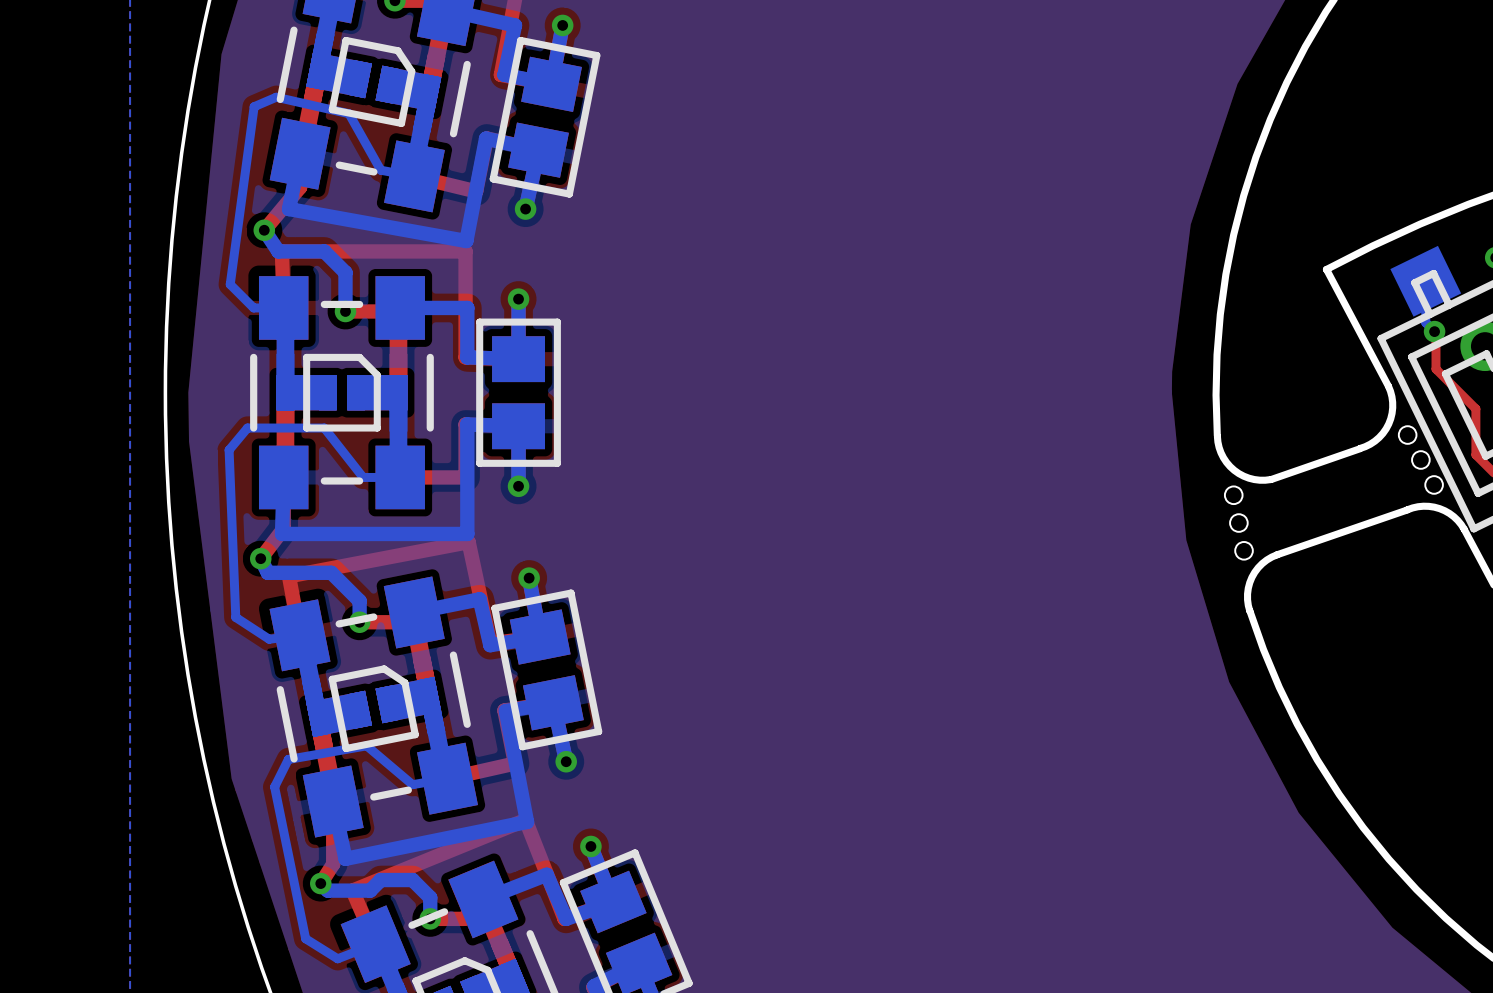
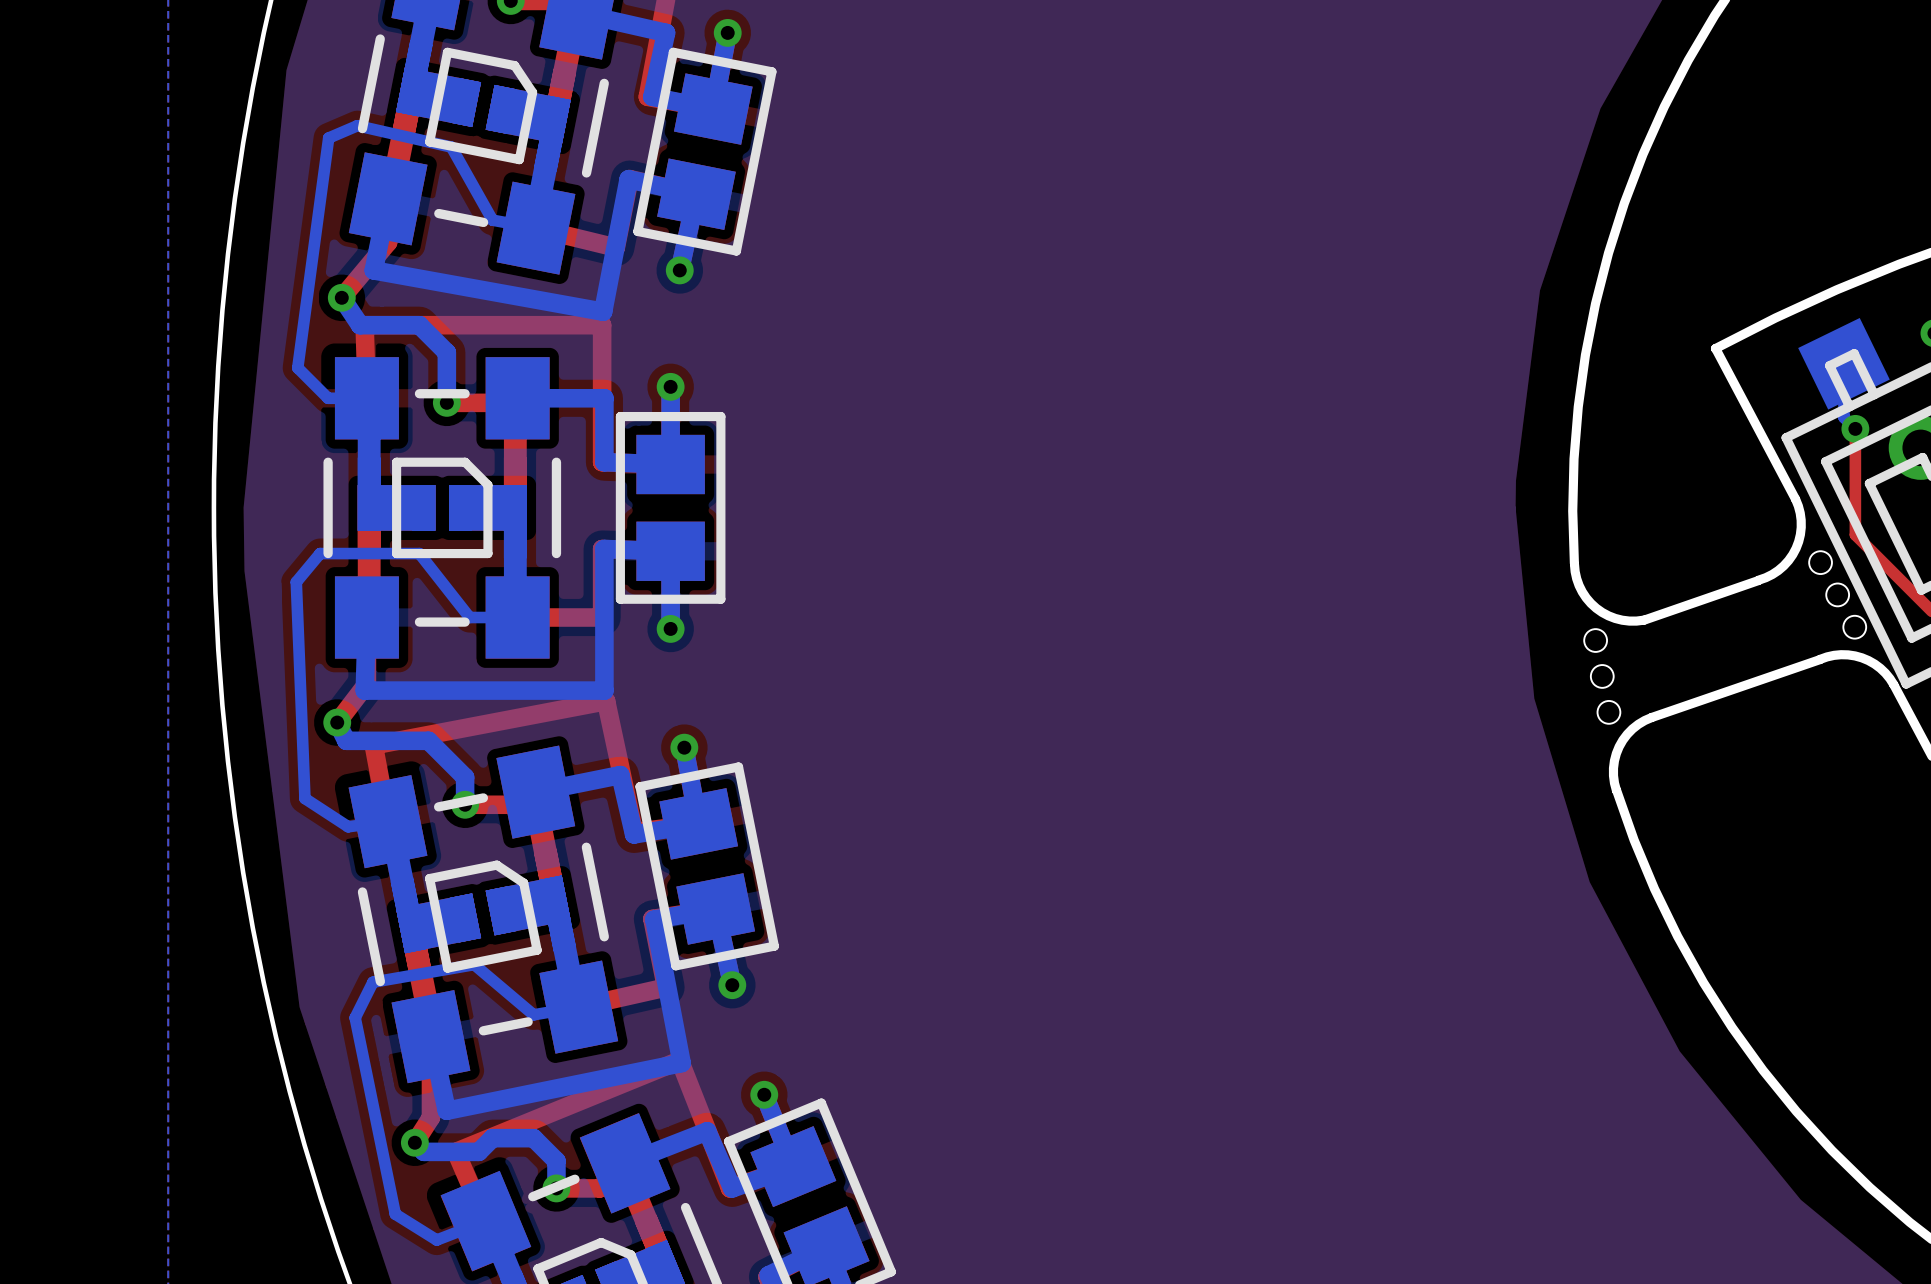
top track: (1434, 331) (1435, 369) (1475, 408) (1475, 454) -> (1855, 428) (1855, 534) (1908, 588)

